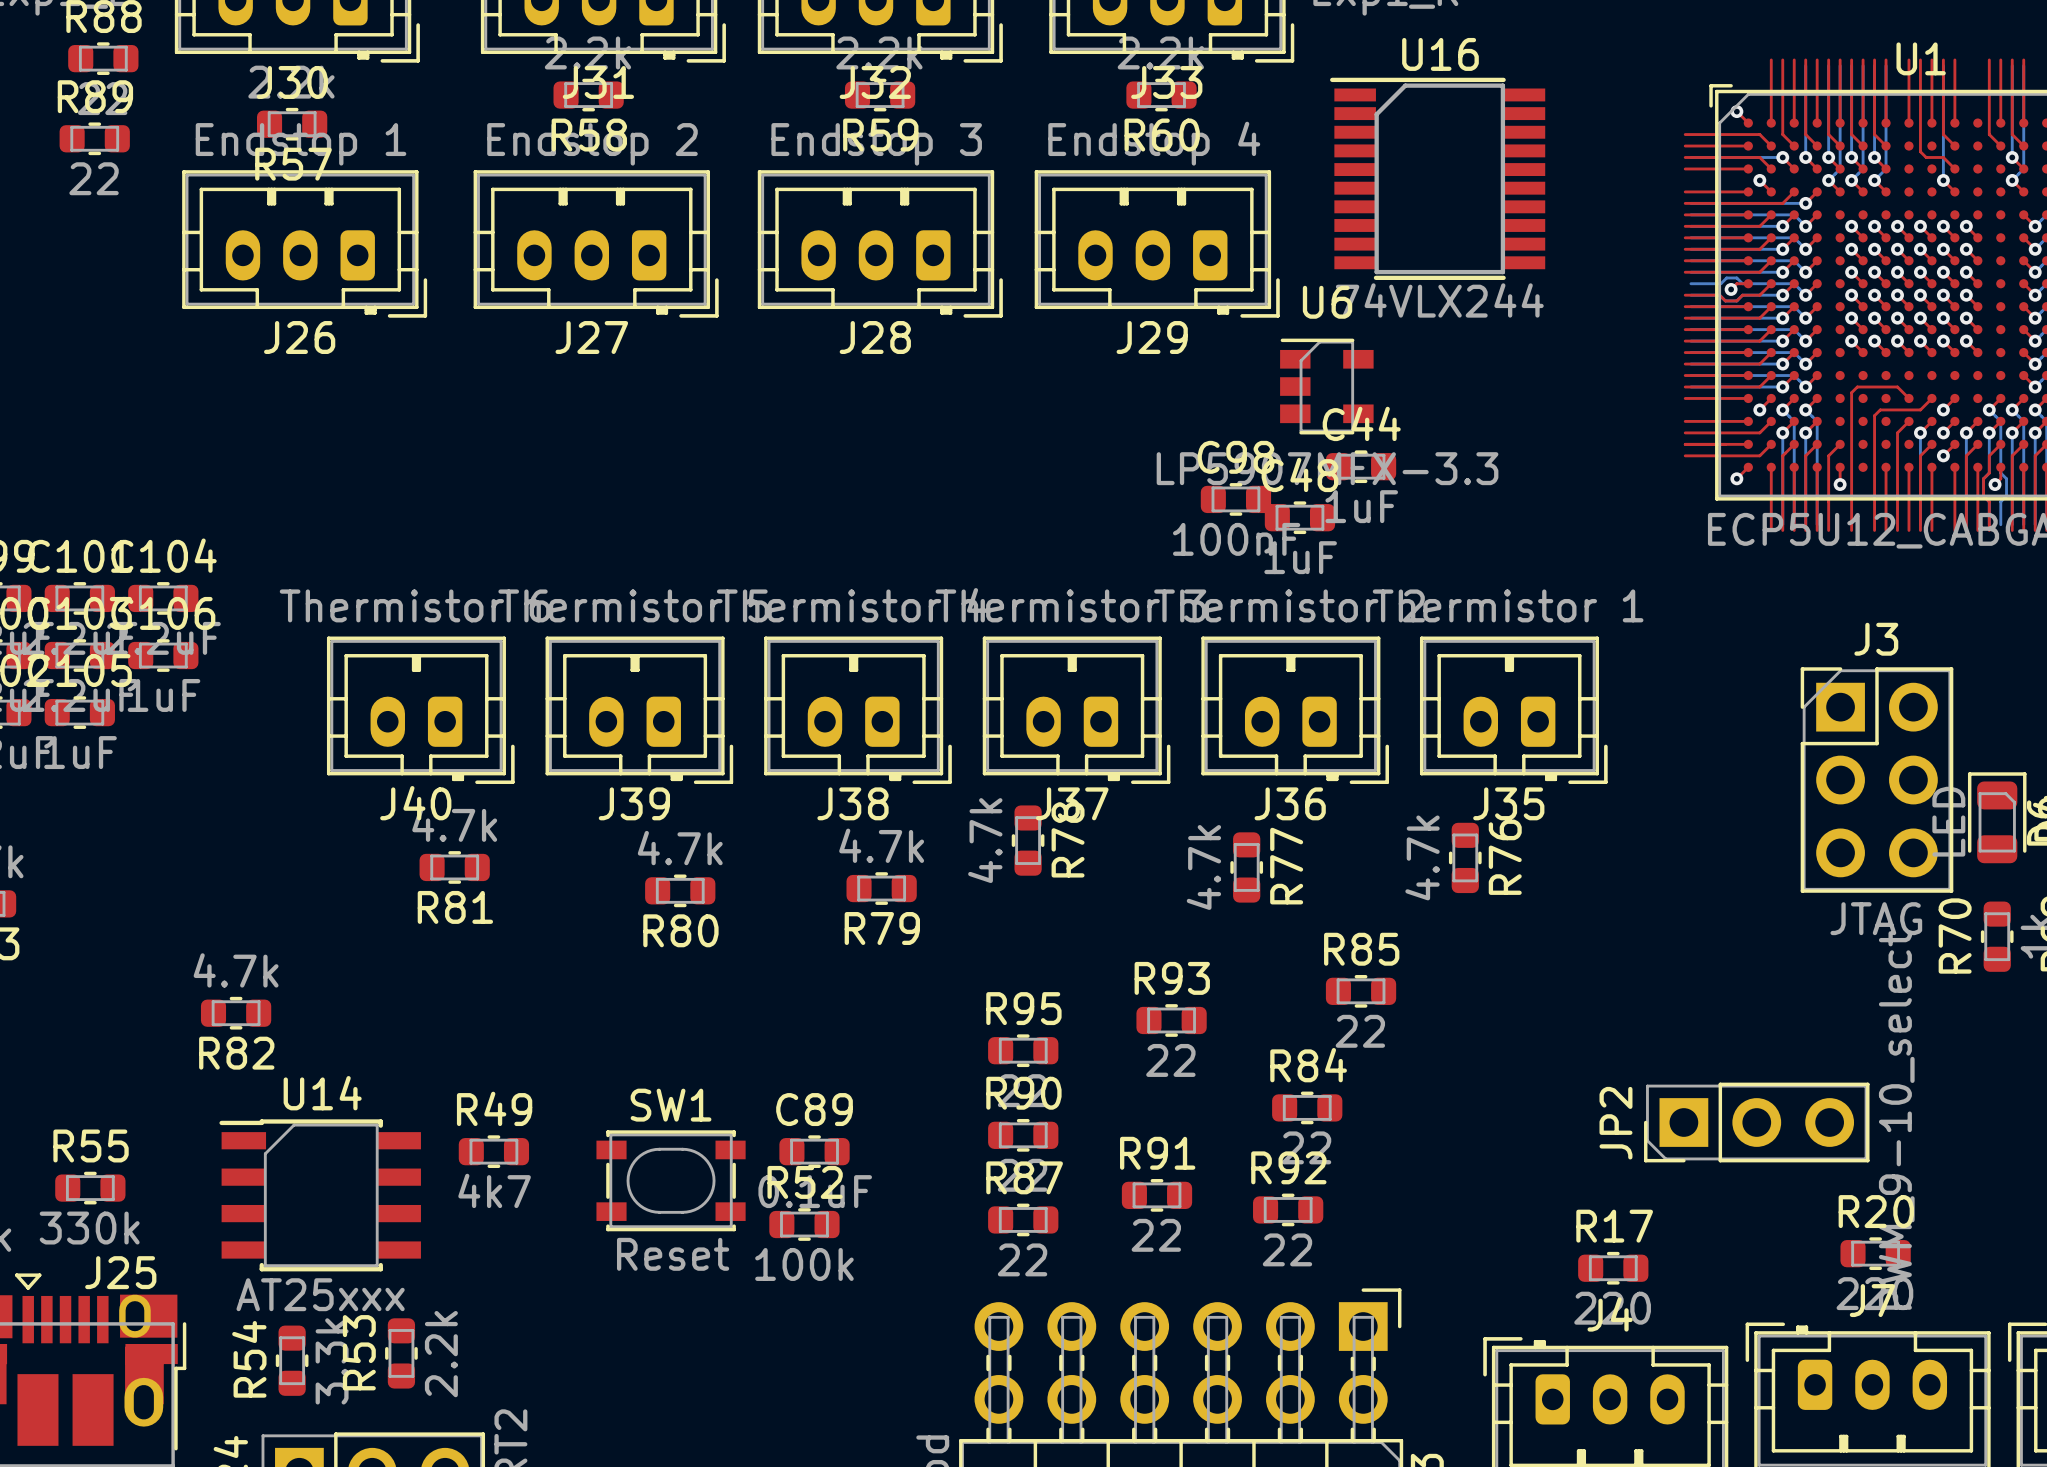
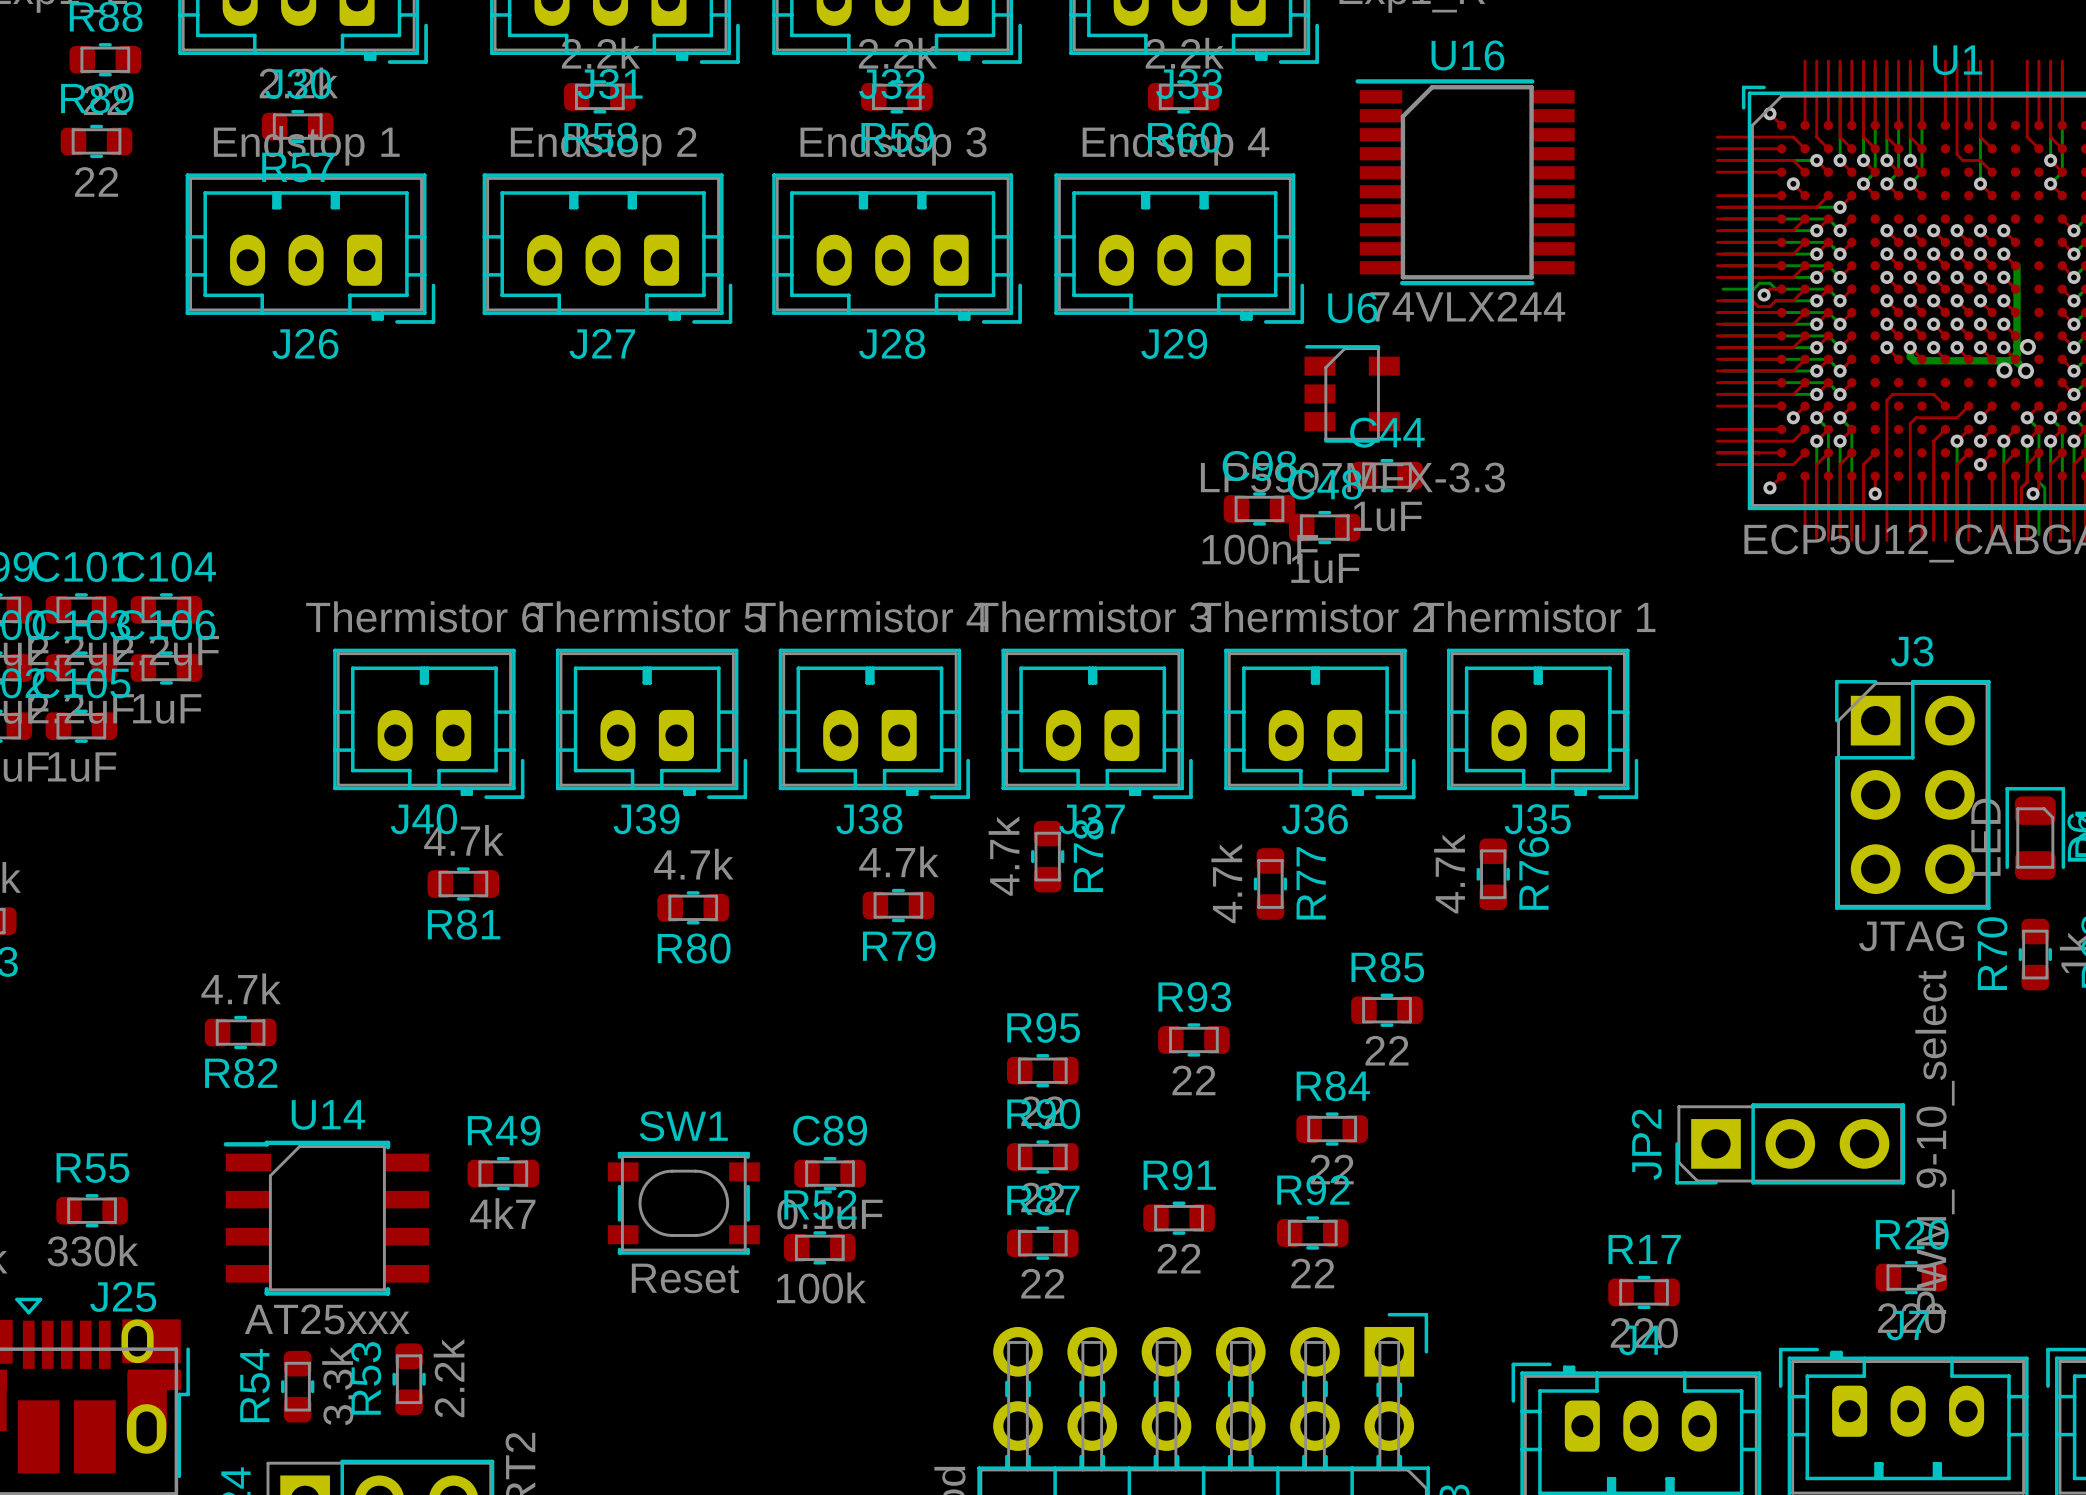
bottom track: none -> (2017, 265) (2017, 362) (2025, 370)
via: none -> (2027, 346)
bottom track: none -> (1910, 347) (1910, 356) (1914, 360) (2010, 360) (2017, 353)
via: none -> (2004, 370)
via: none -> (2025, 370)

